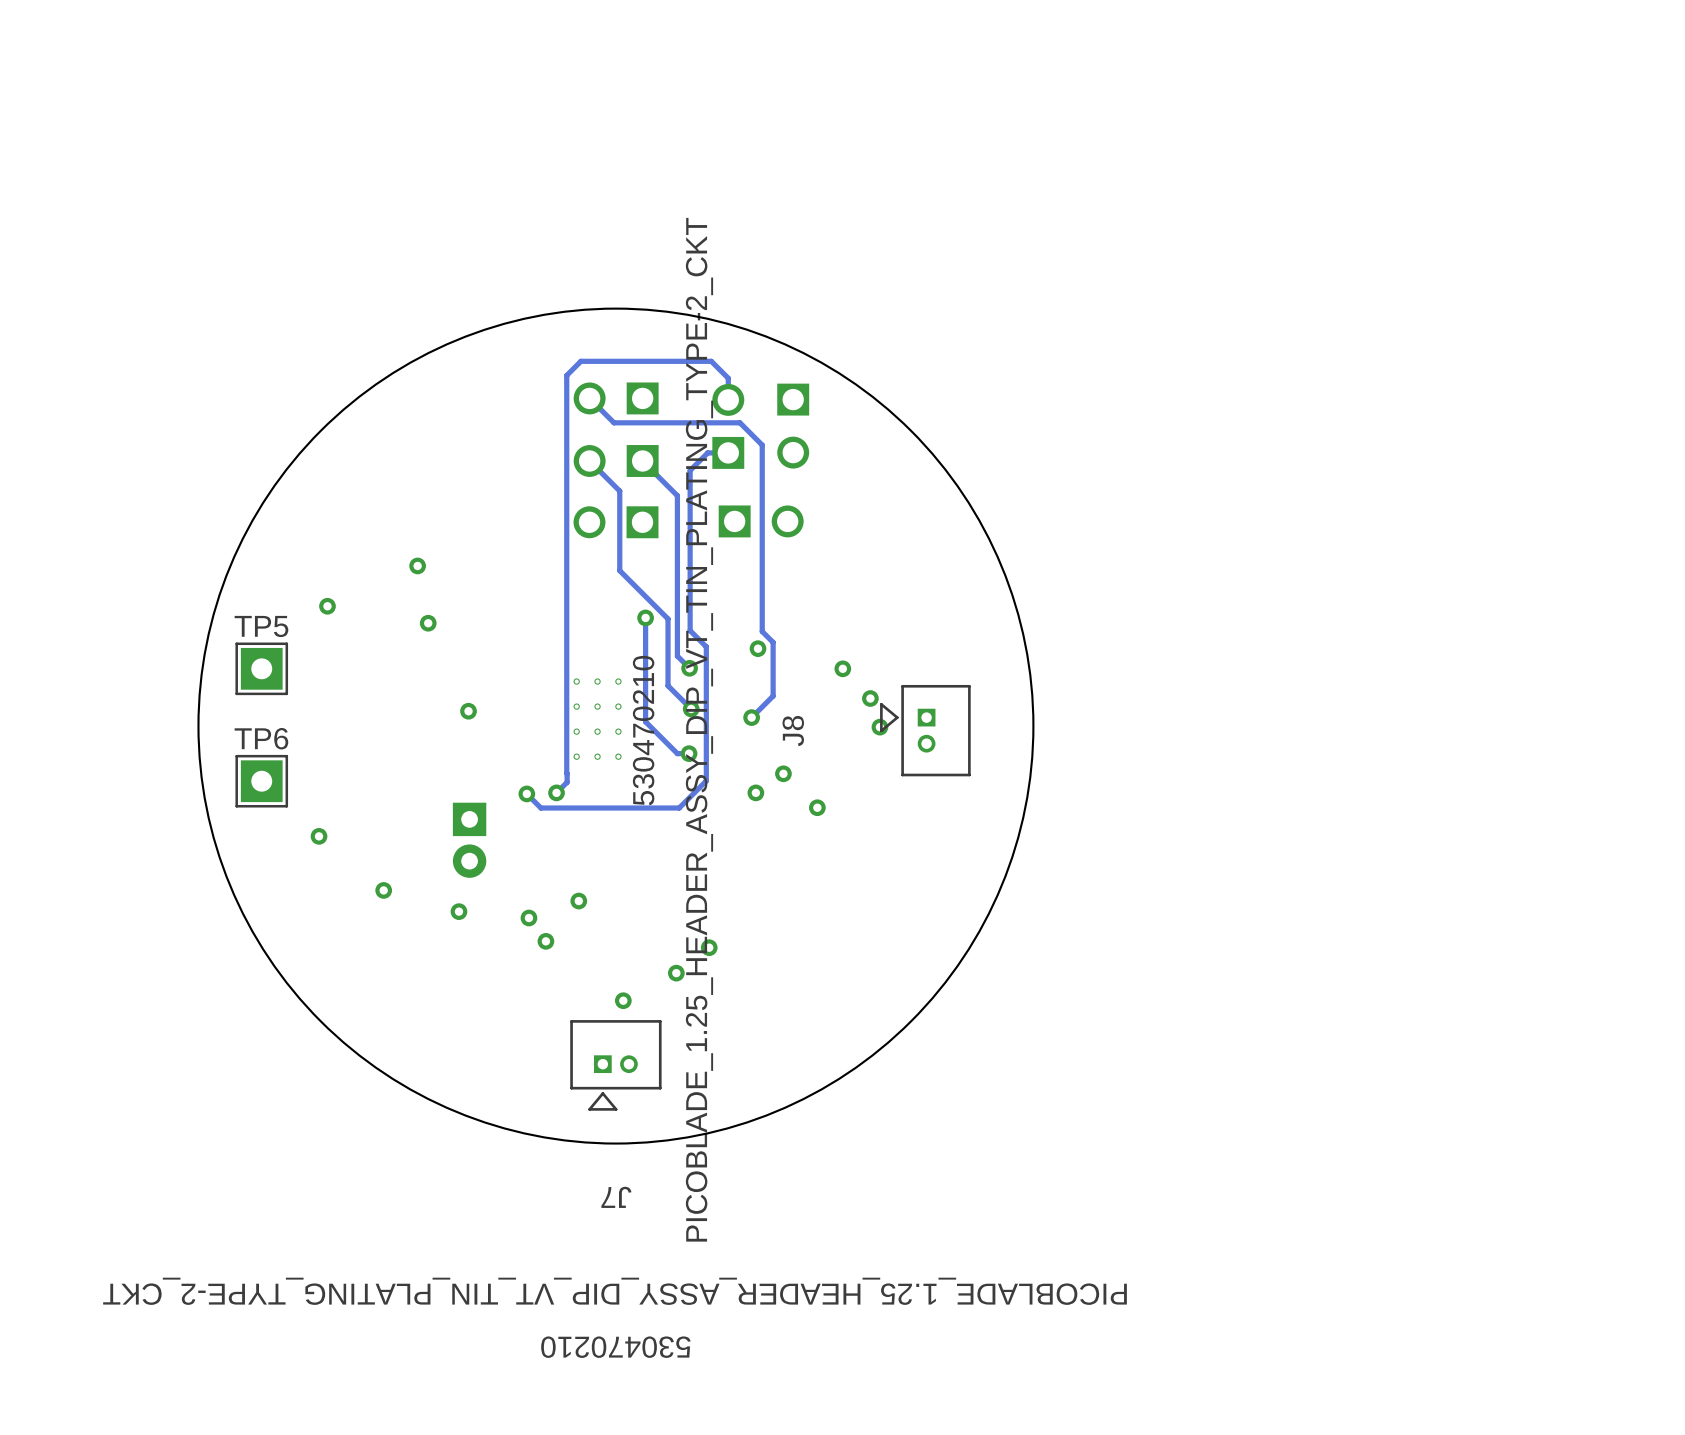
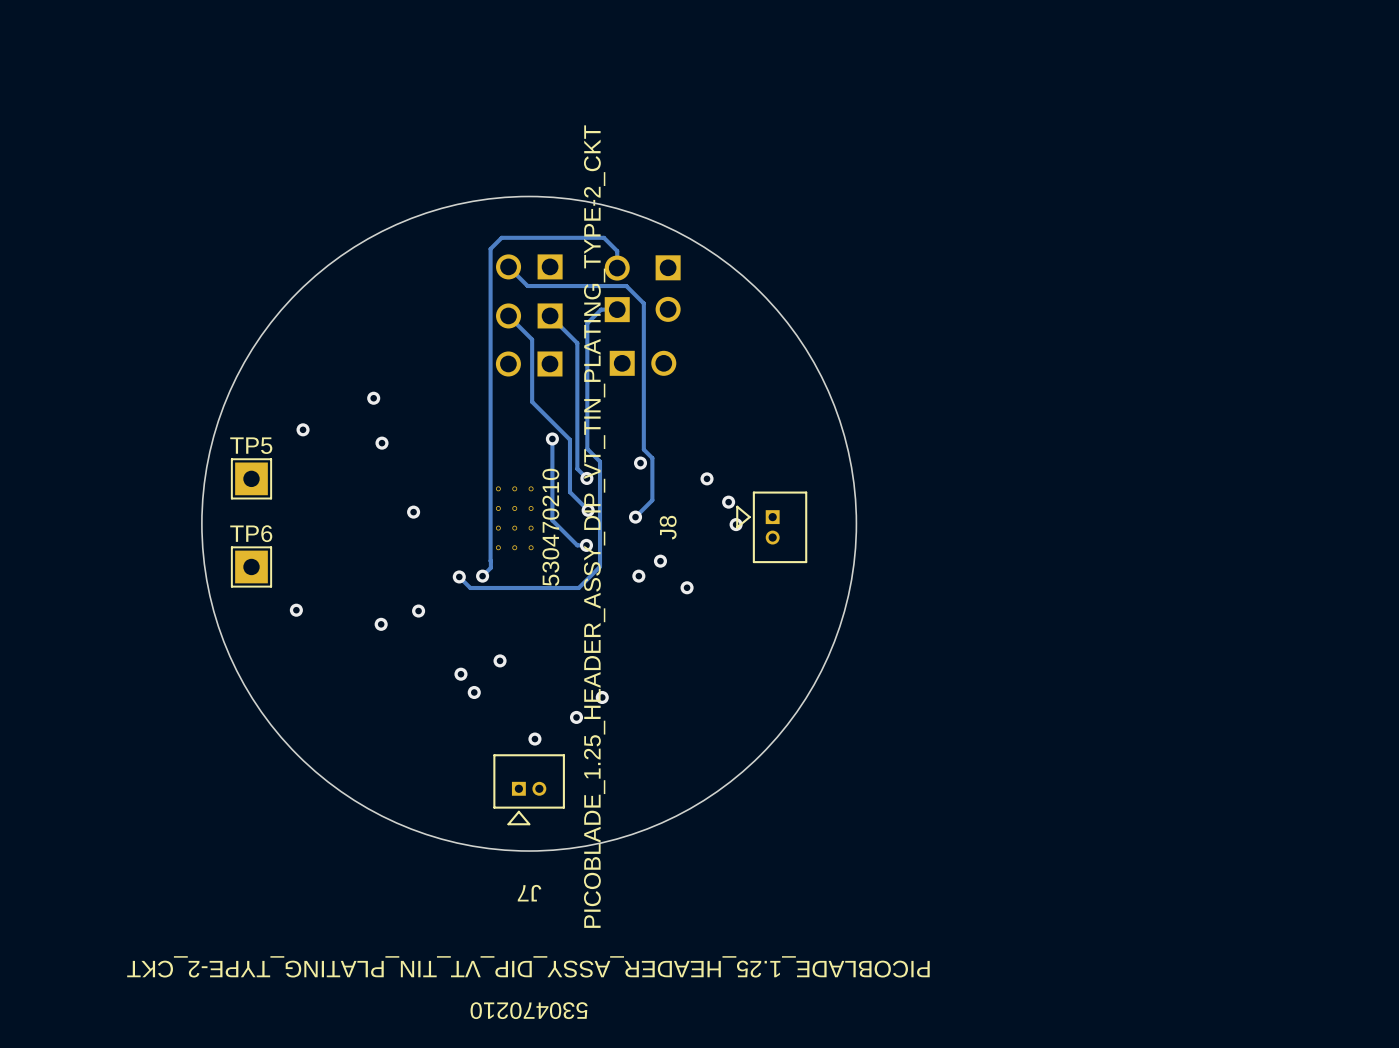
via: none -> (418, 611)
part: (469, 840) -> none
via: none -> (381, 624)
via: (383, 890) -> none
via: (458, 911) -> none

